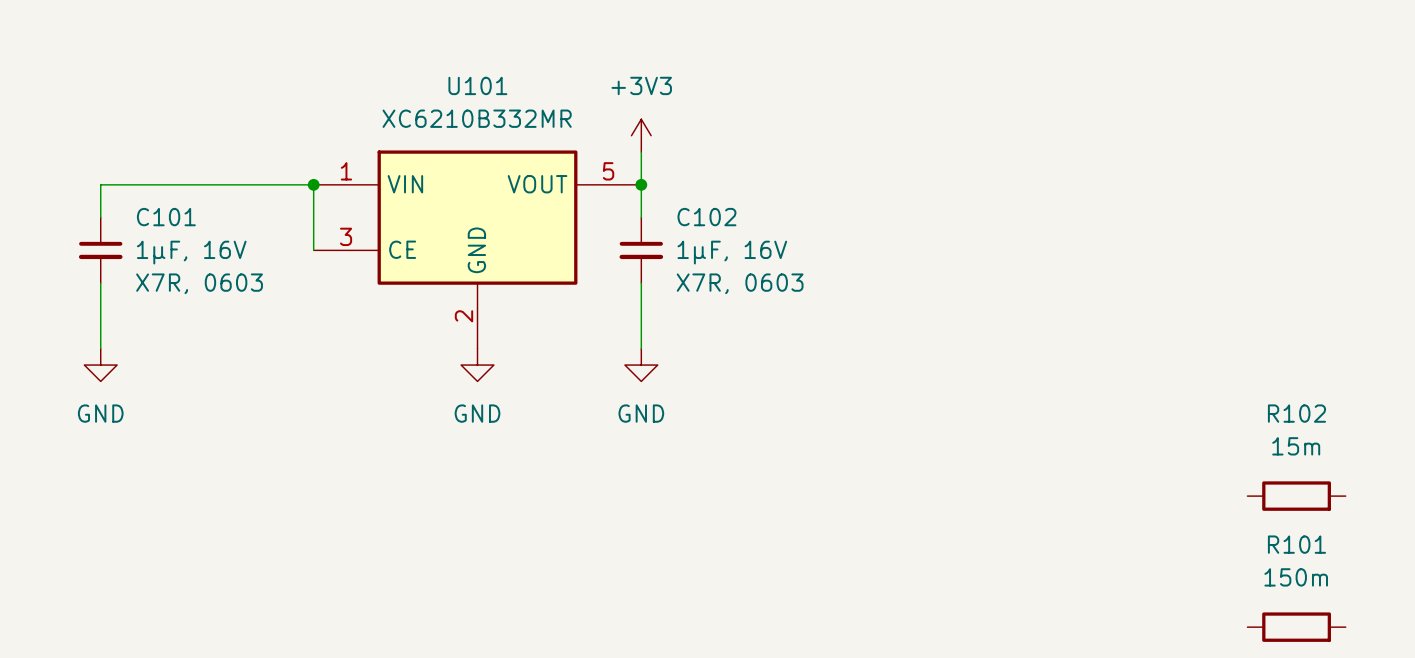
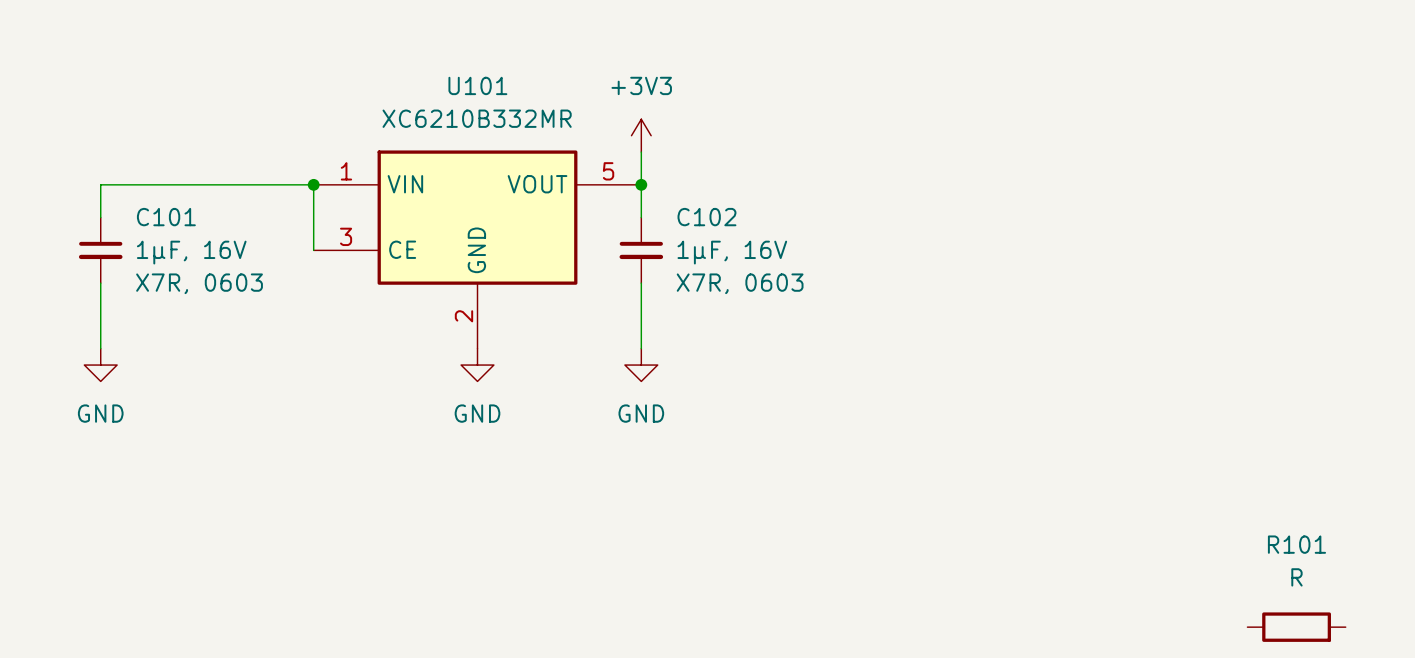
R102: 15m (1296, 496) -> none
R101 value: 150m (1296, 577) -> R (1296, 577)

